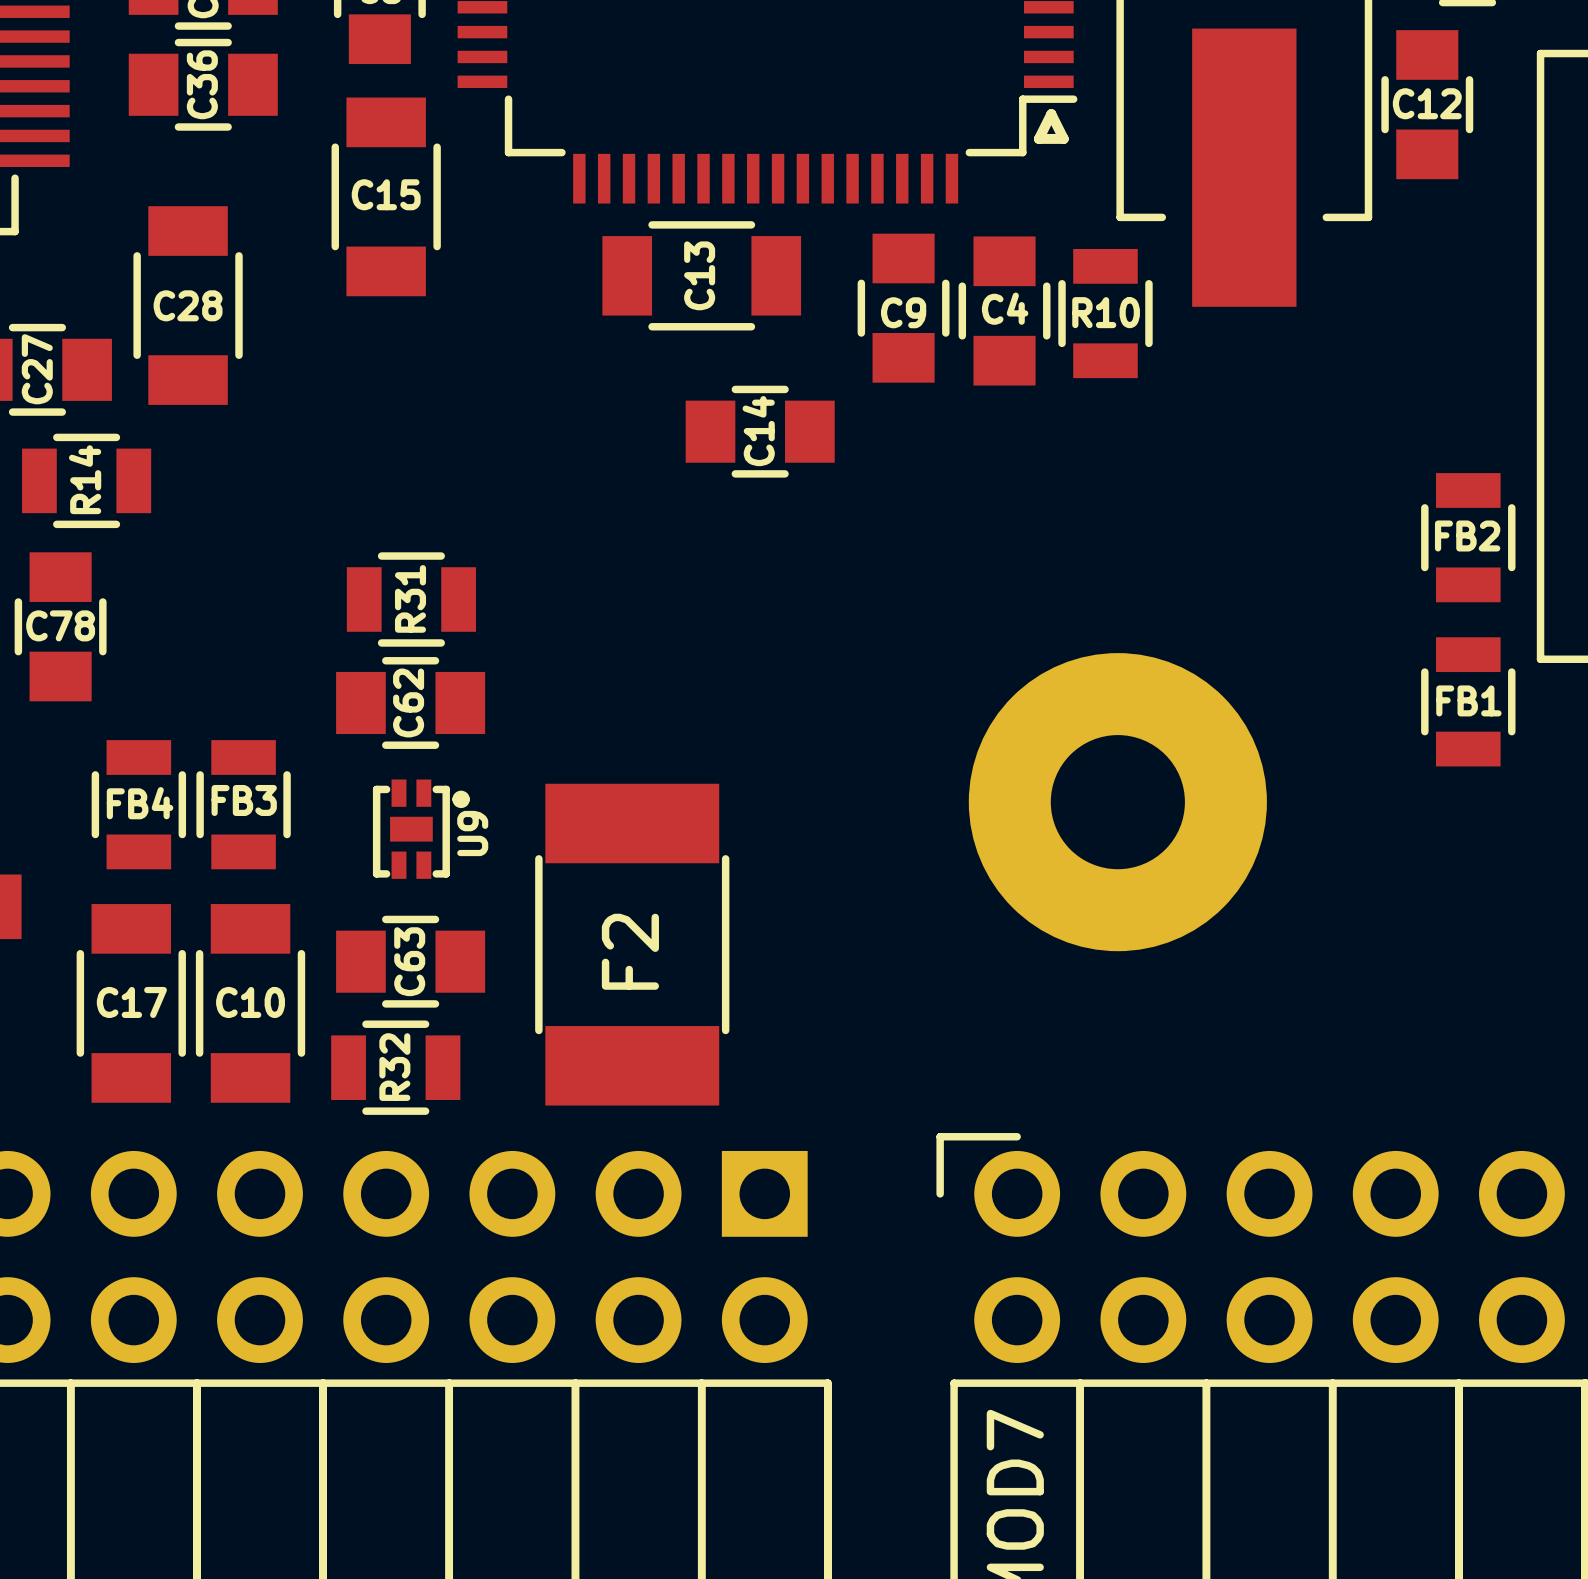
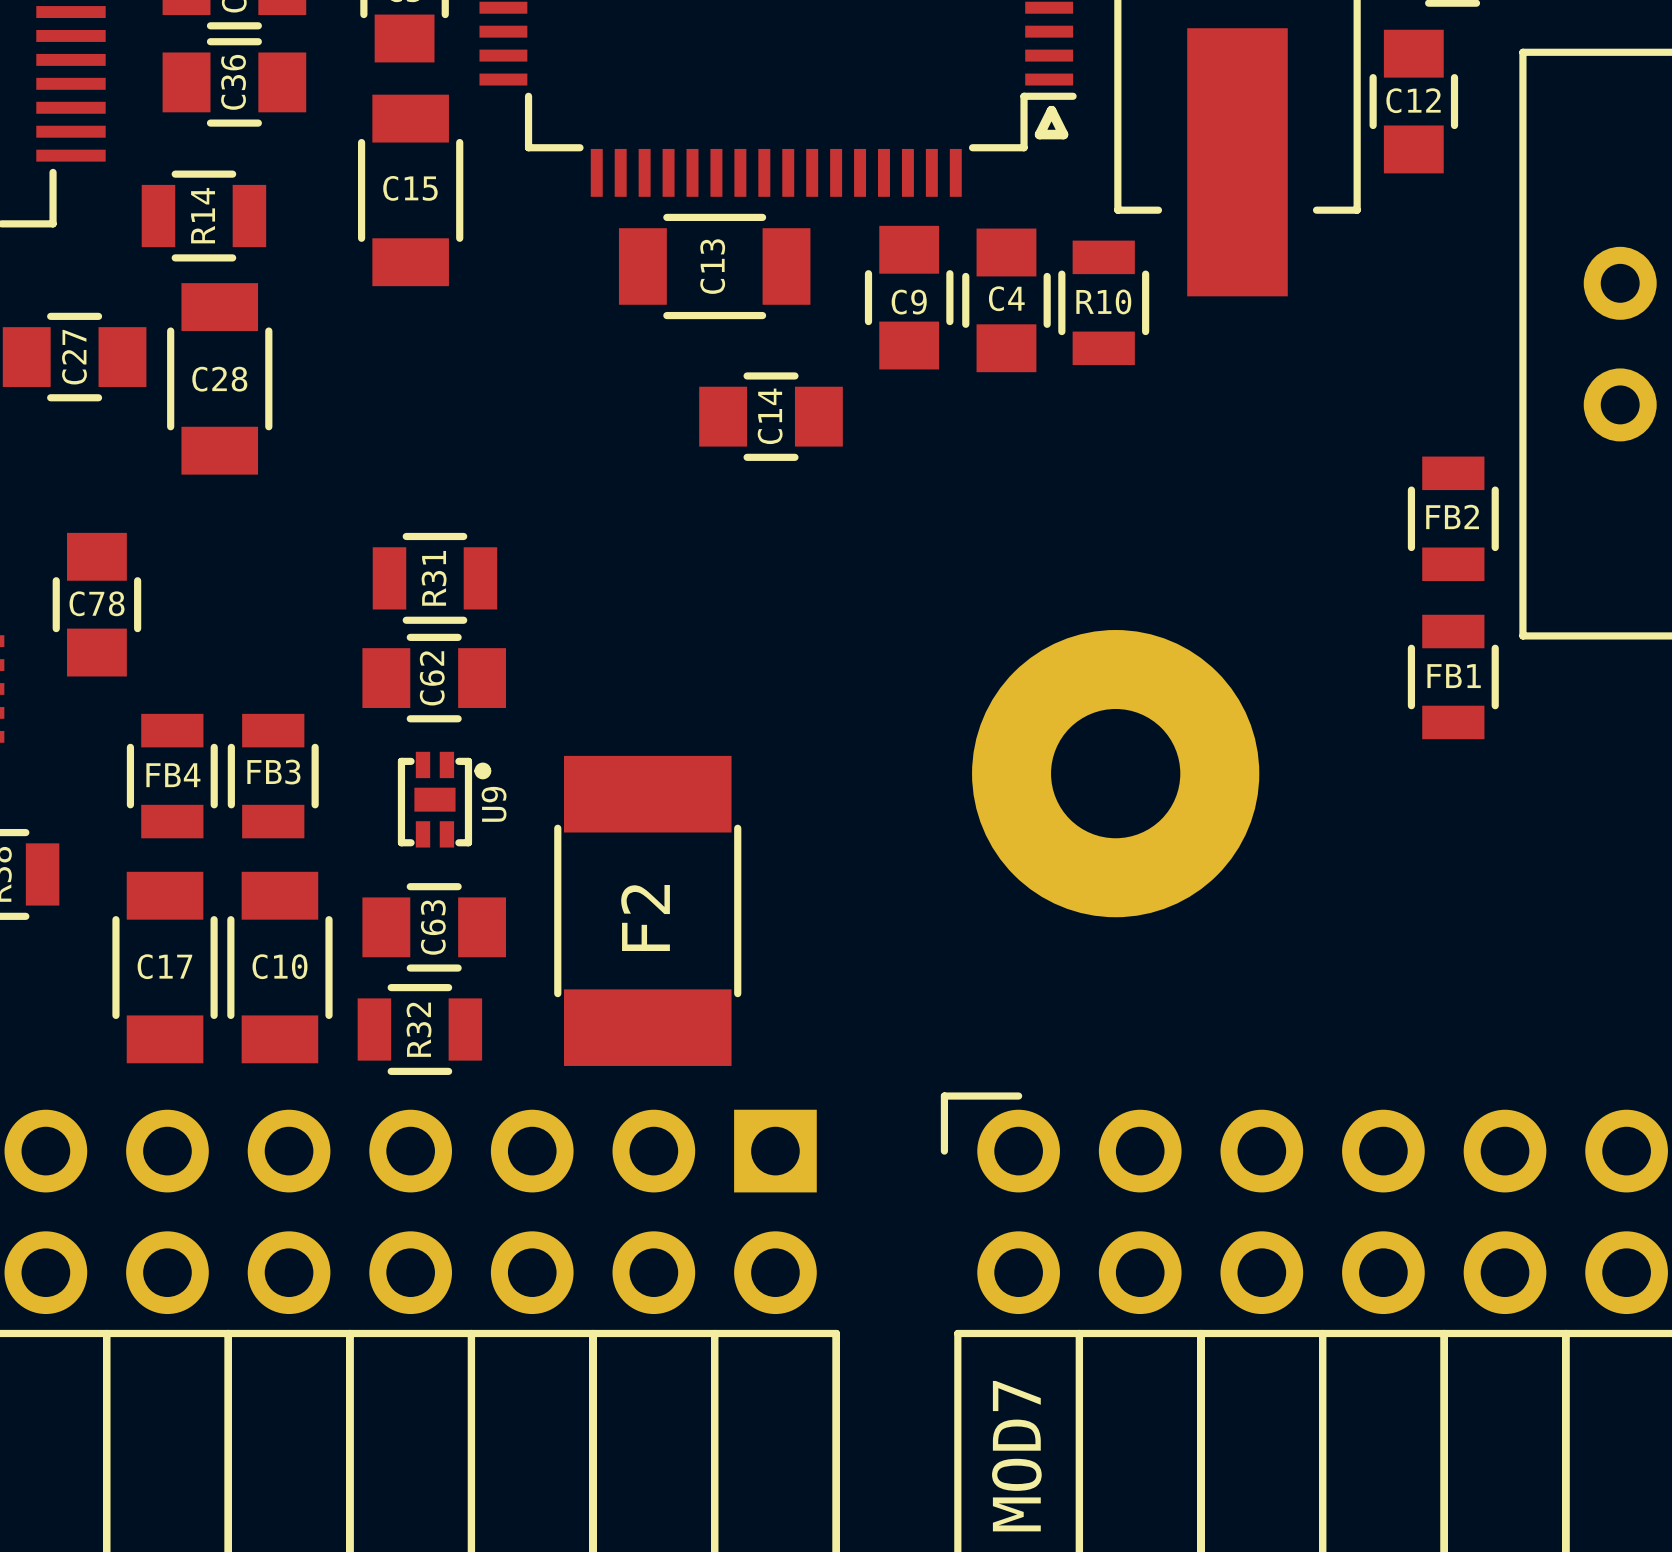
C28 position: (188, 305) -> (219, 378)
R14 position: (86, 480) -> (203, 216)

